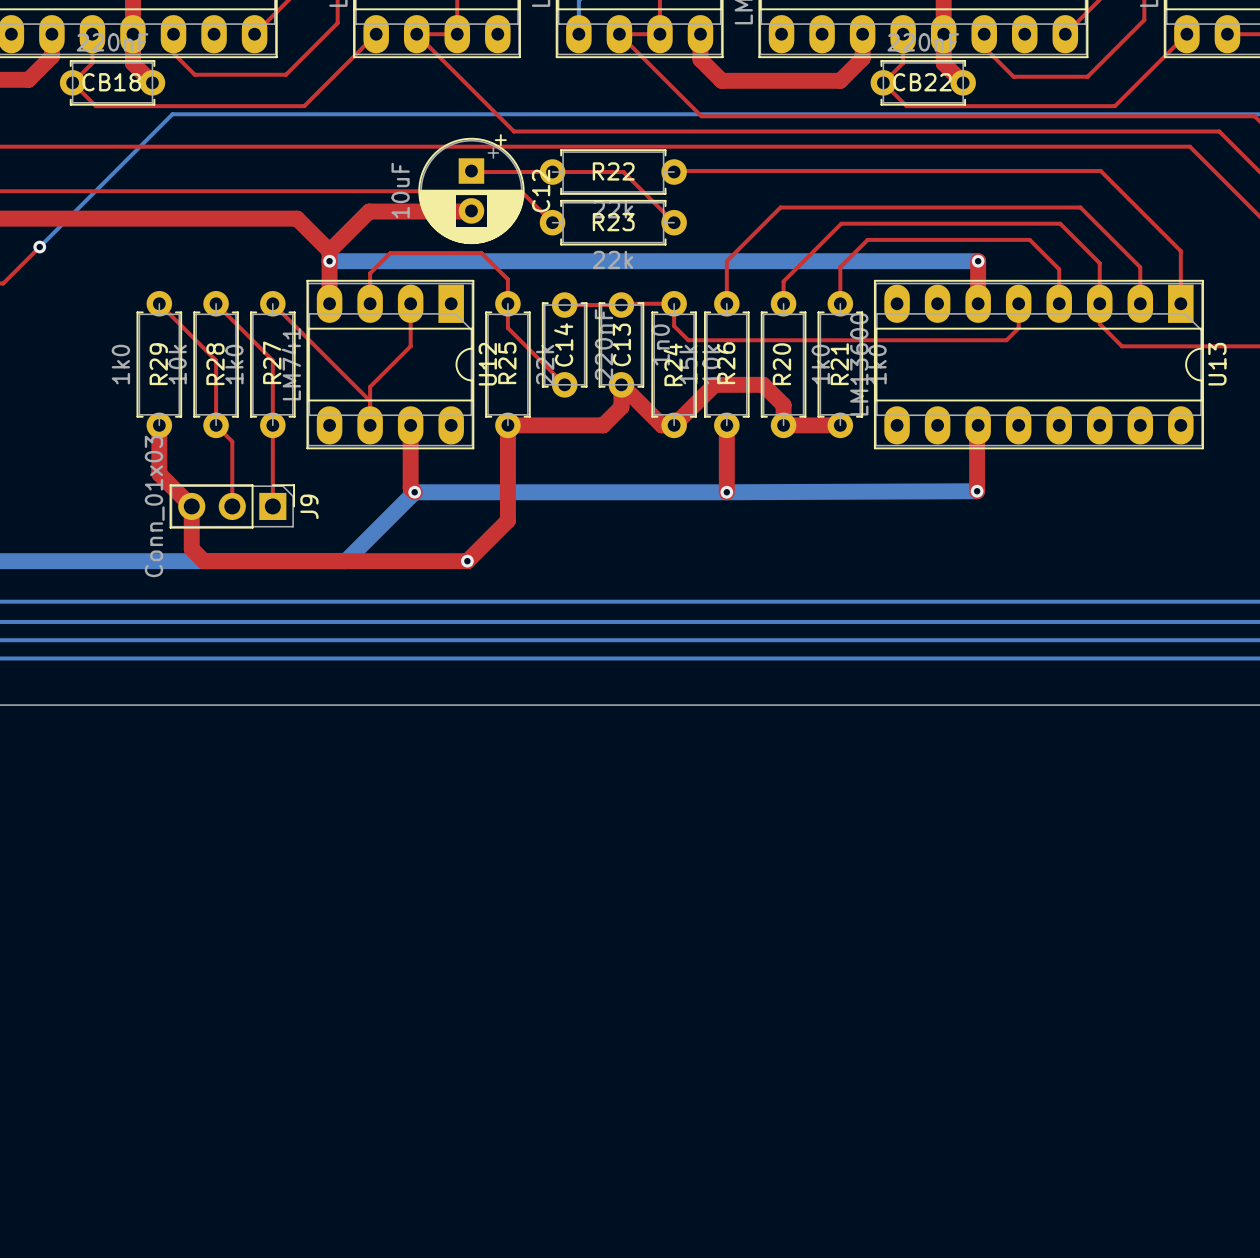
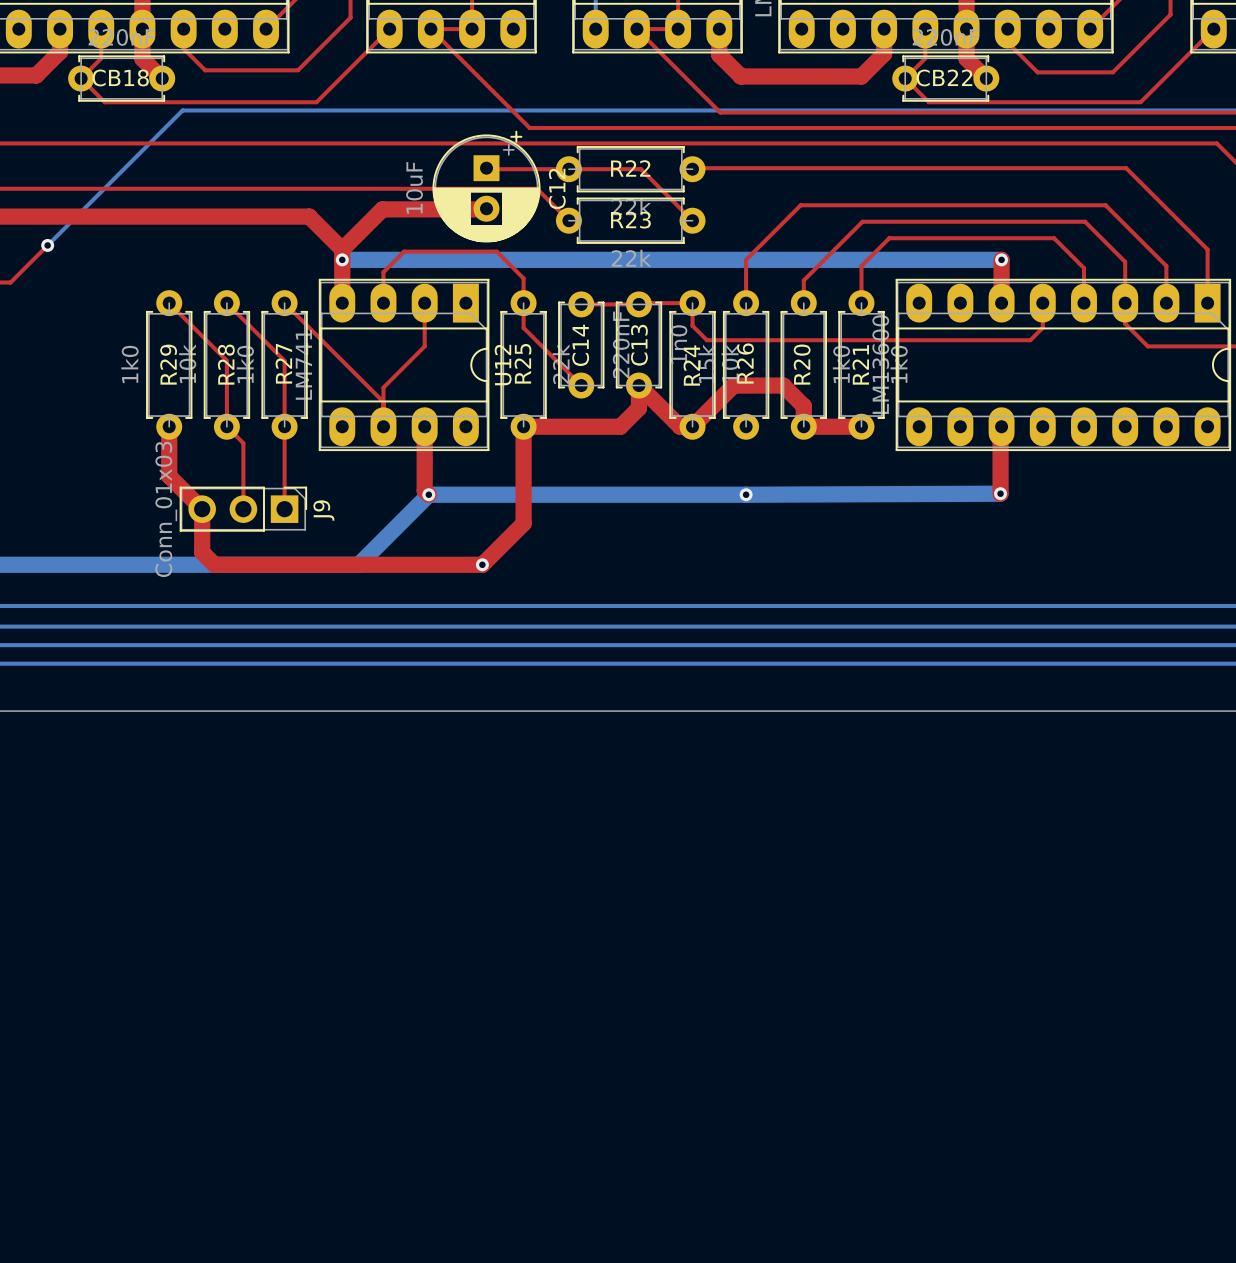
top track: (726, 425) (726, 492) -> none

